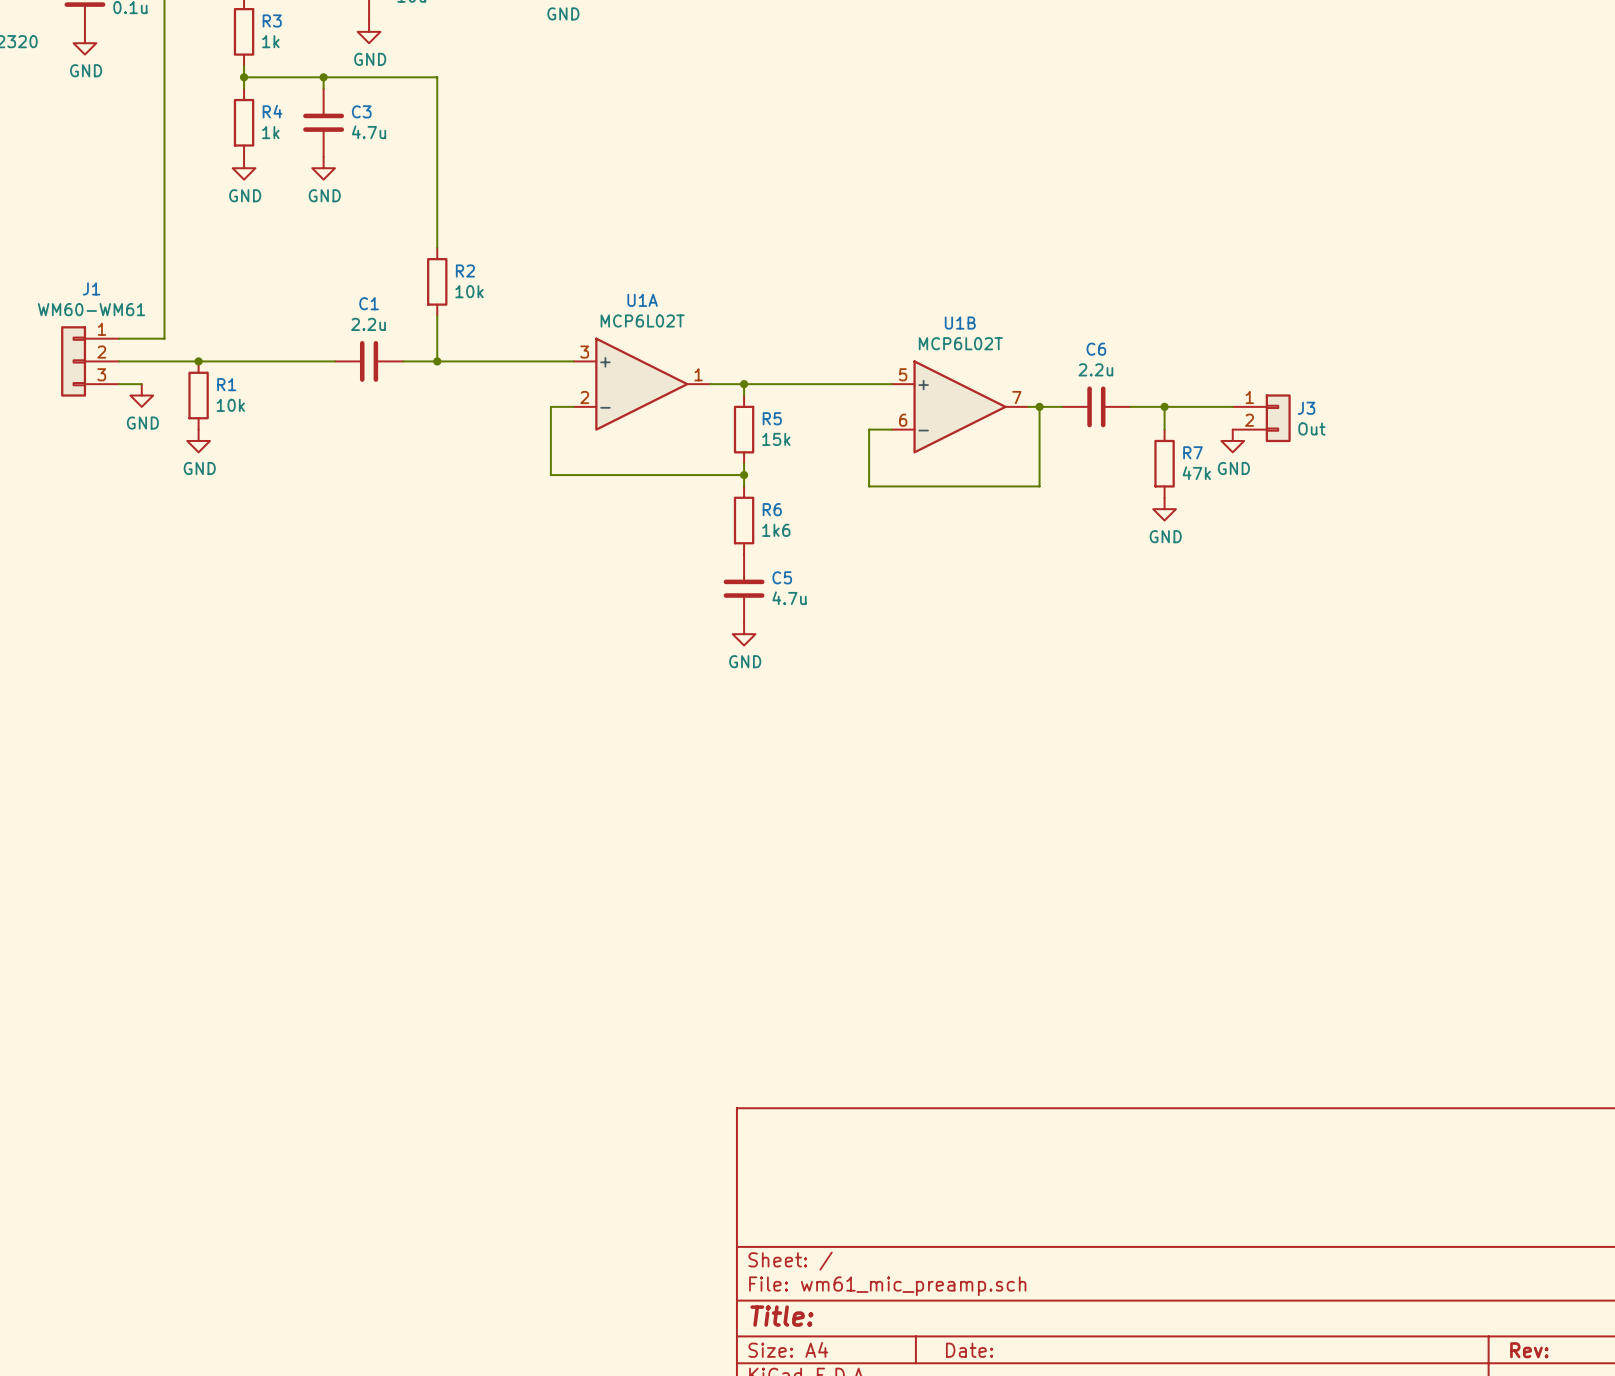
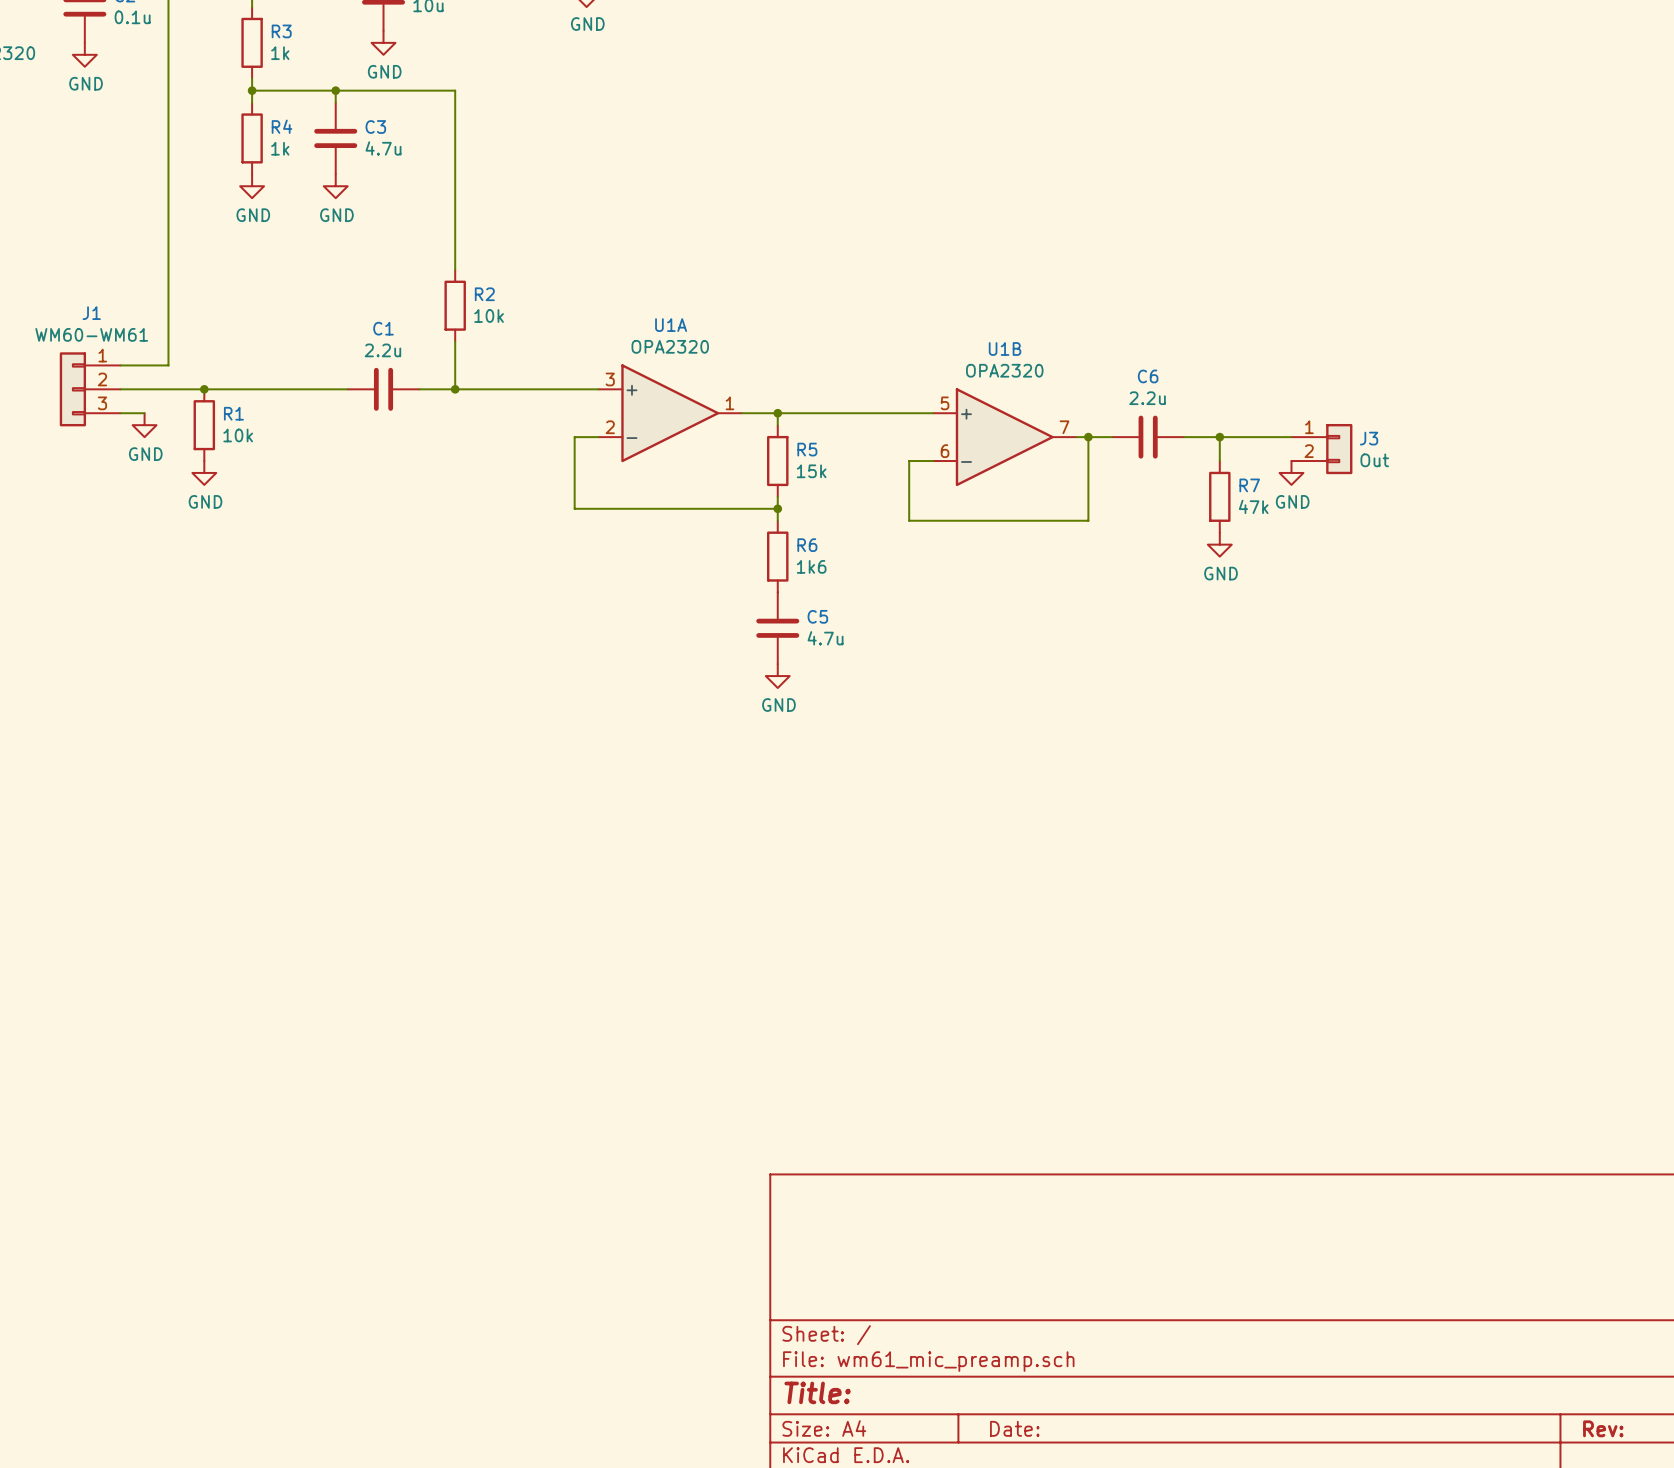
U1A value: MCP6L02T (642, 320) -> OPA2320 (670, 346)
U1B value: MCP6L02T (960, 343) -> OPA2320 (1004, 370)

